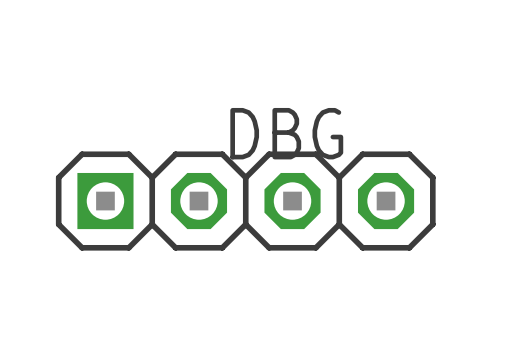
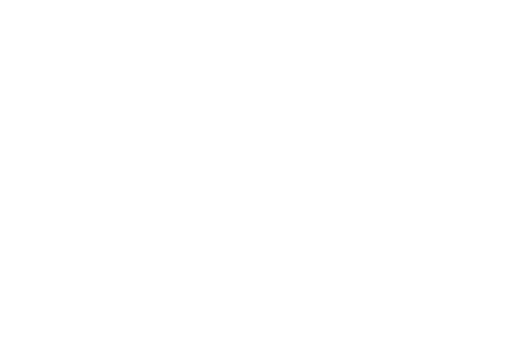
DBG: (245, 201) -> none

